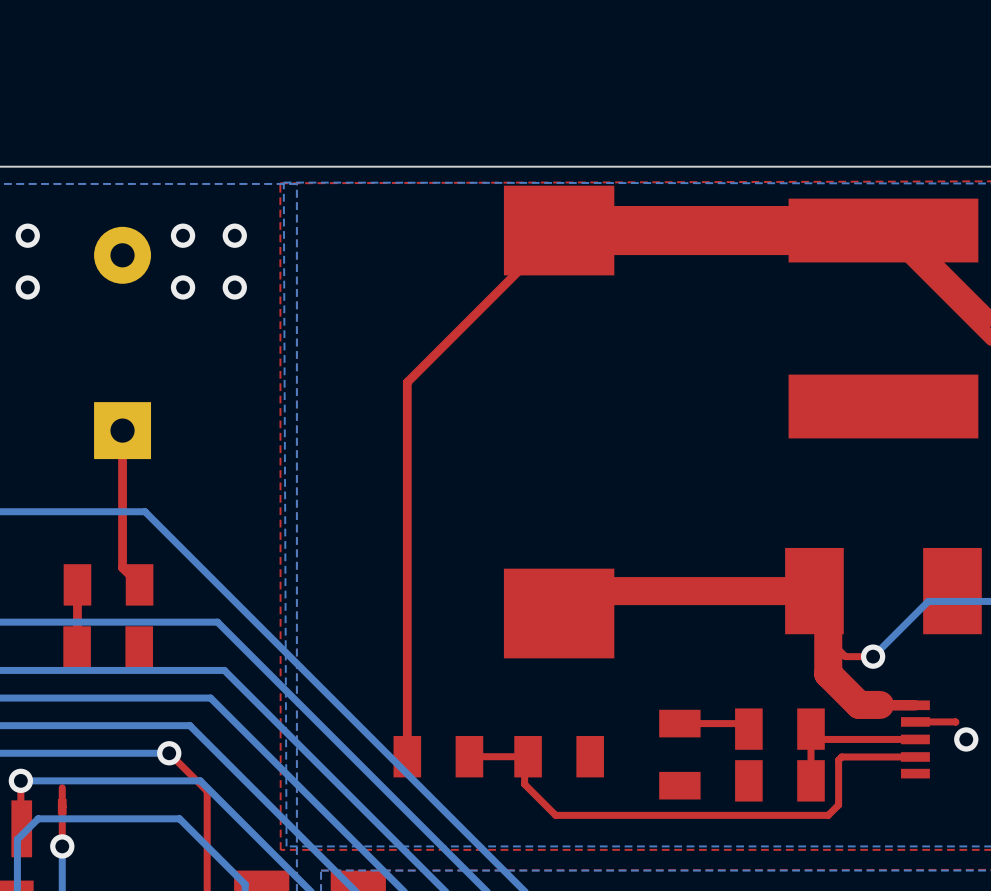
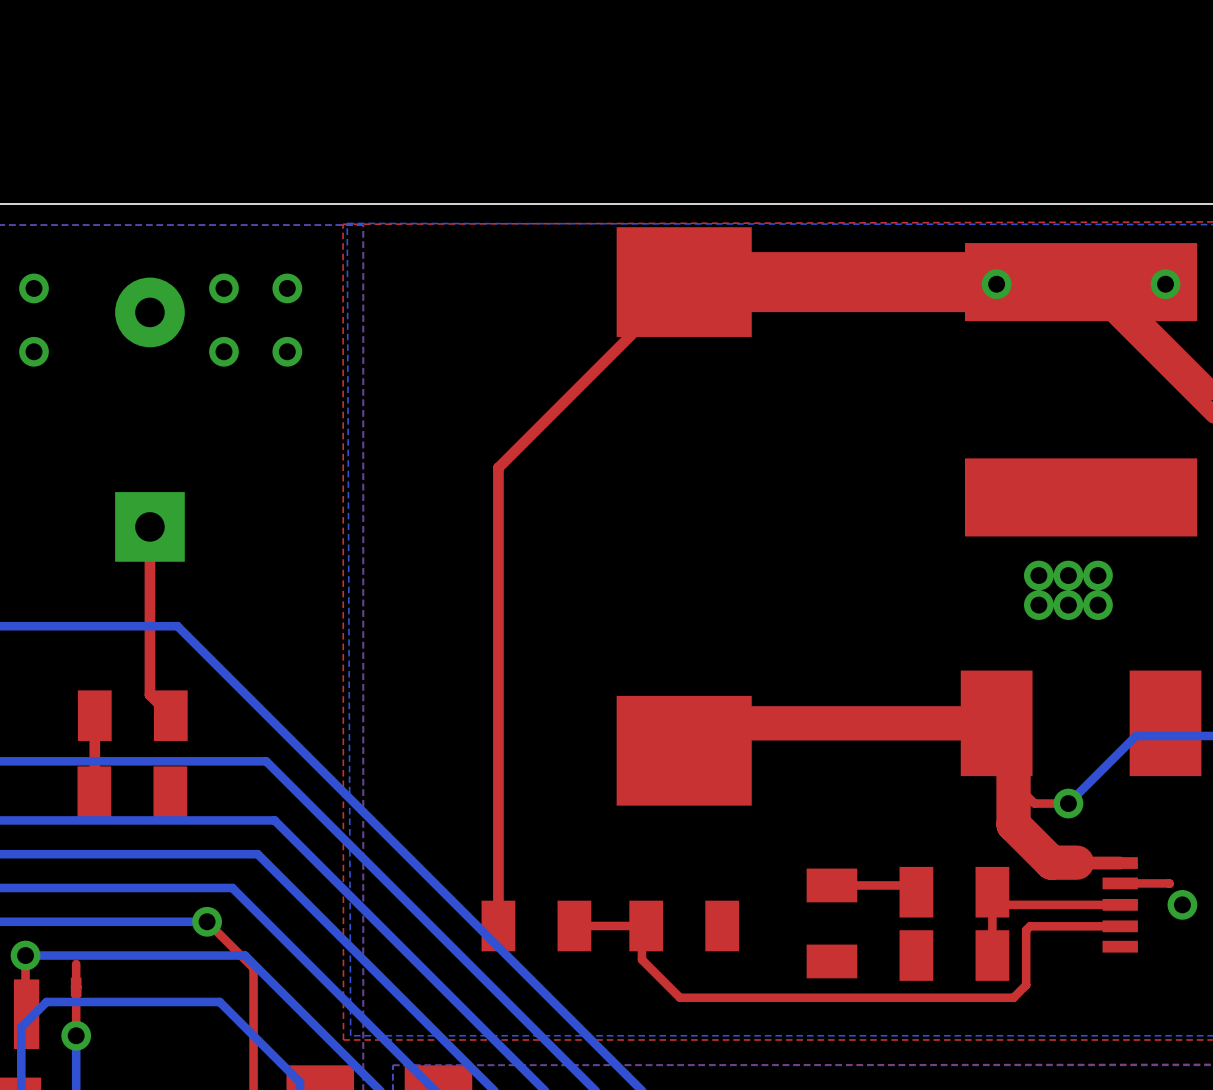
via: none -> (996, 284)
via: none -> (1165, 284)
via: none -> (1038, 575)
via: none -> (1068, 575)
via: none -> (1097, 575)
via: none -> (1038, 605)
via: none -> (1068, 605)
via: none -> (1097, 605)

